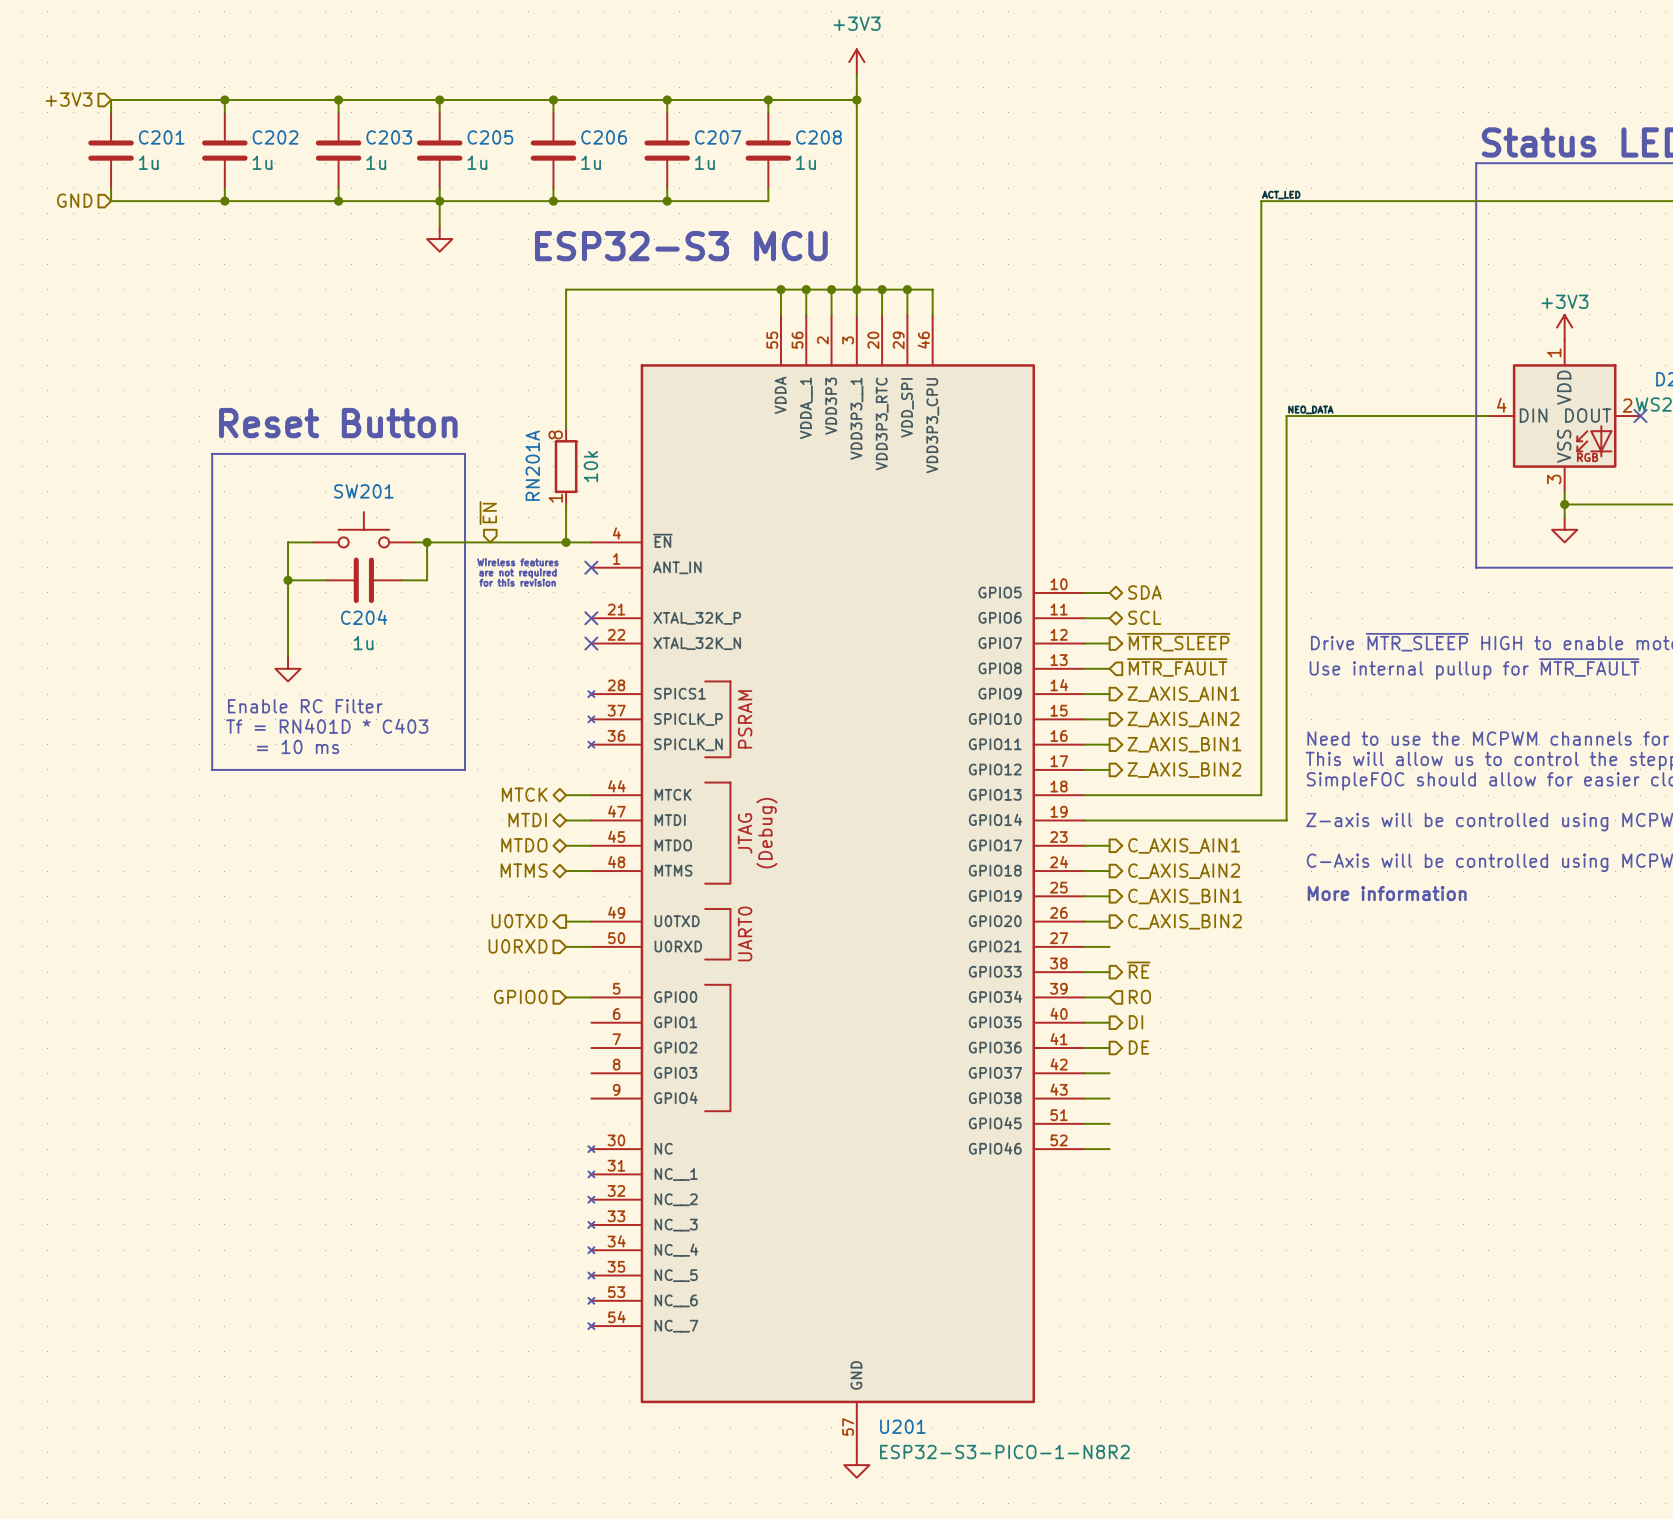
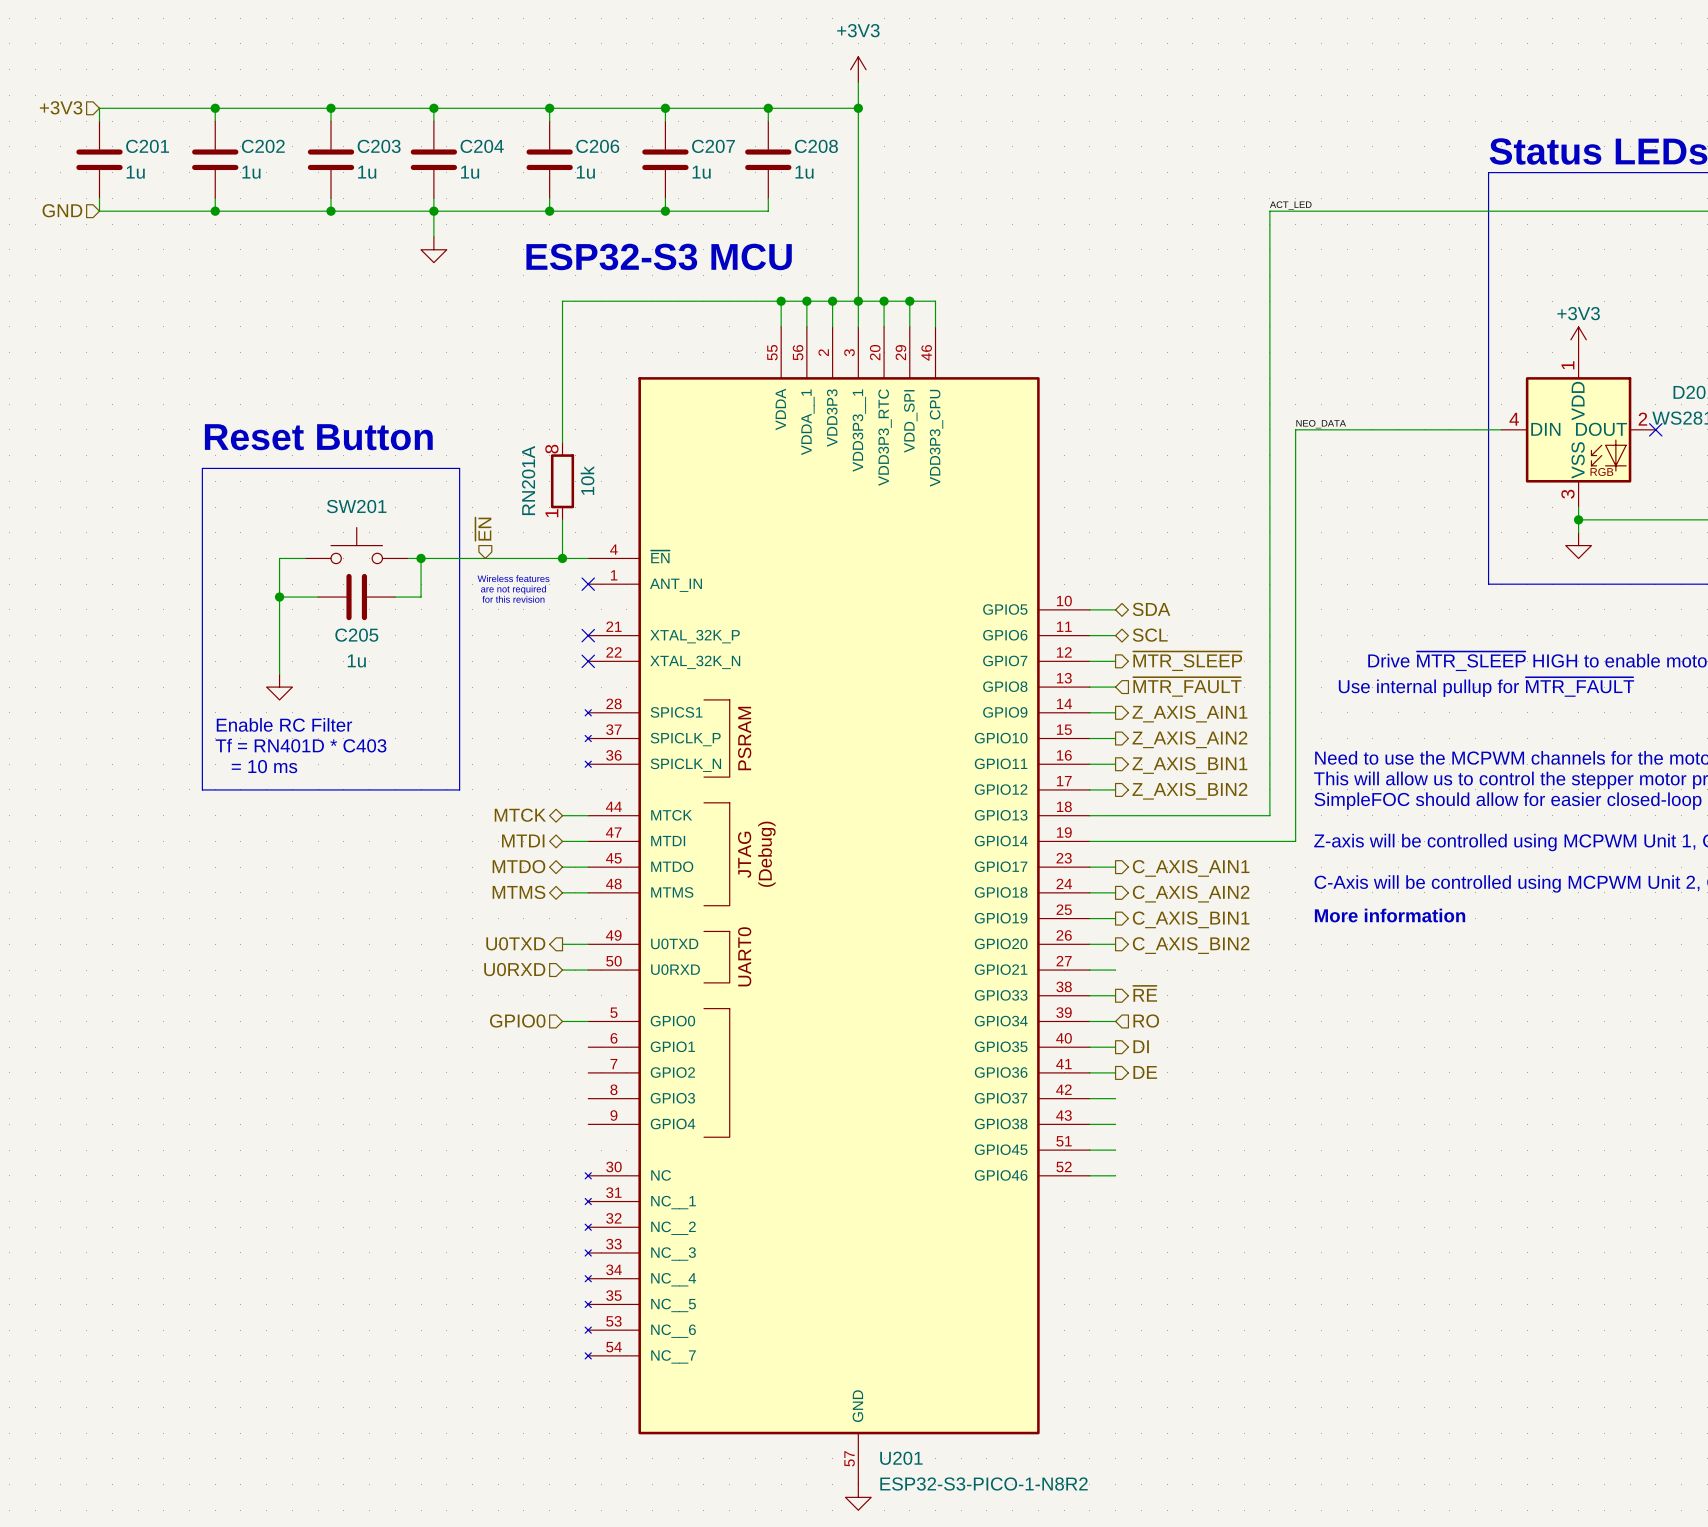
C205 name: C205 (490, 137) -> C204 (482, 146)
C204 name: C204 (364, 617) -> C205 (356, 635)

